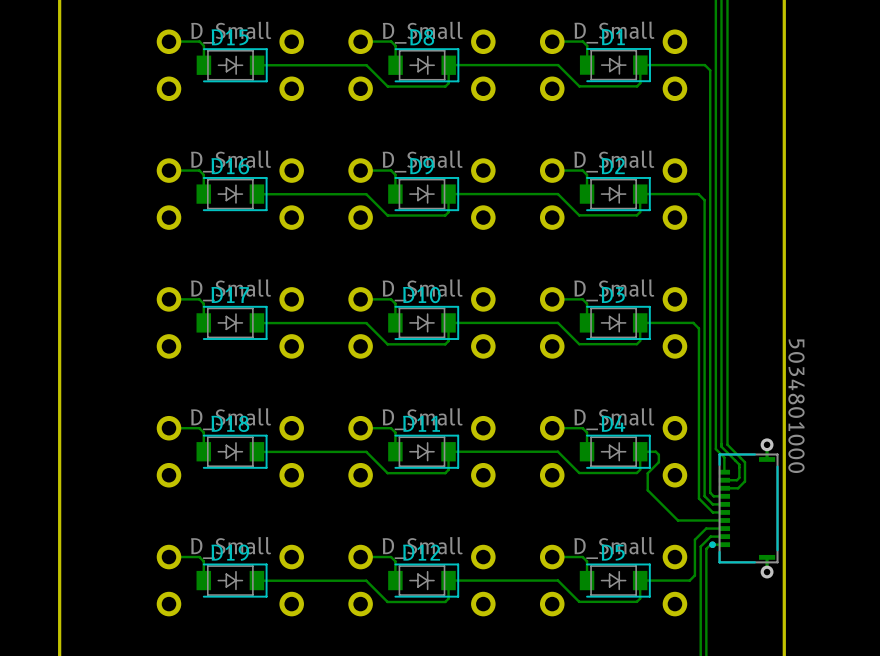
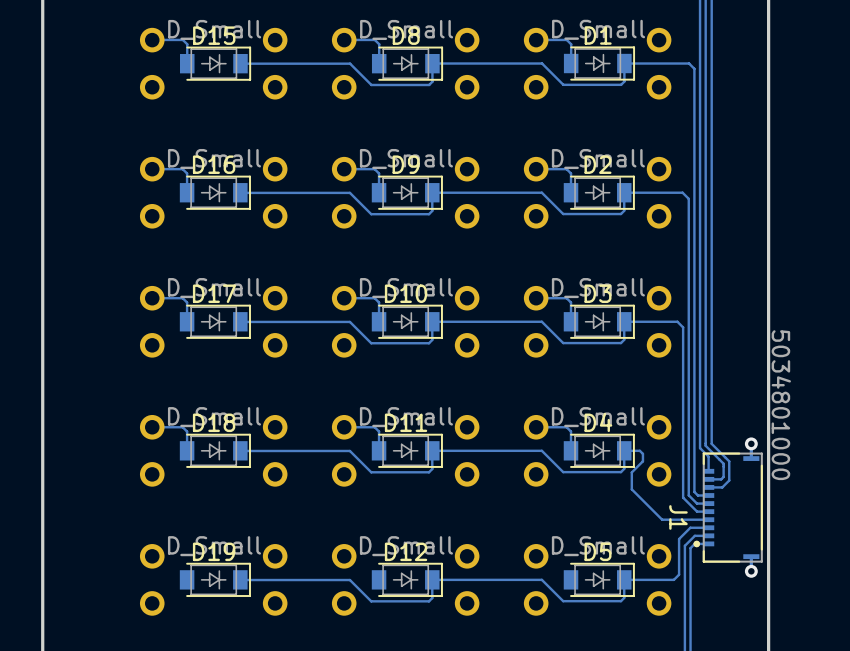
J1 name: none -> J1 (678, 517)
track: (167, 557) (199, 557) (203, 561) (203, 580) -> none
track: (359, 557) (391, 557) (395, 561) (395, 580) -> none
track: (550, 557) (582, 557) (587, 561) (587, 580) -> none

